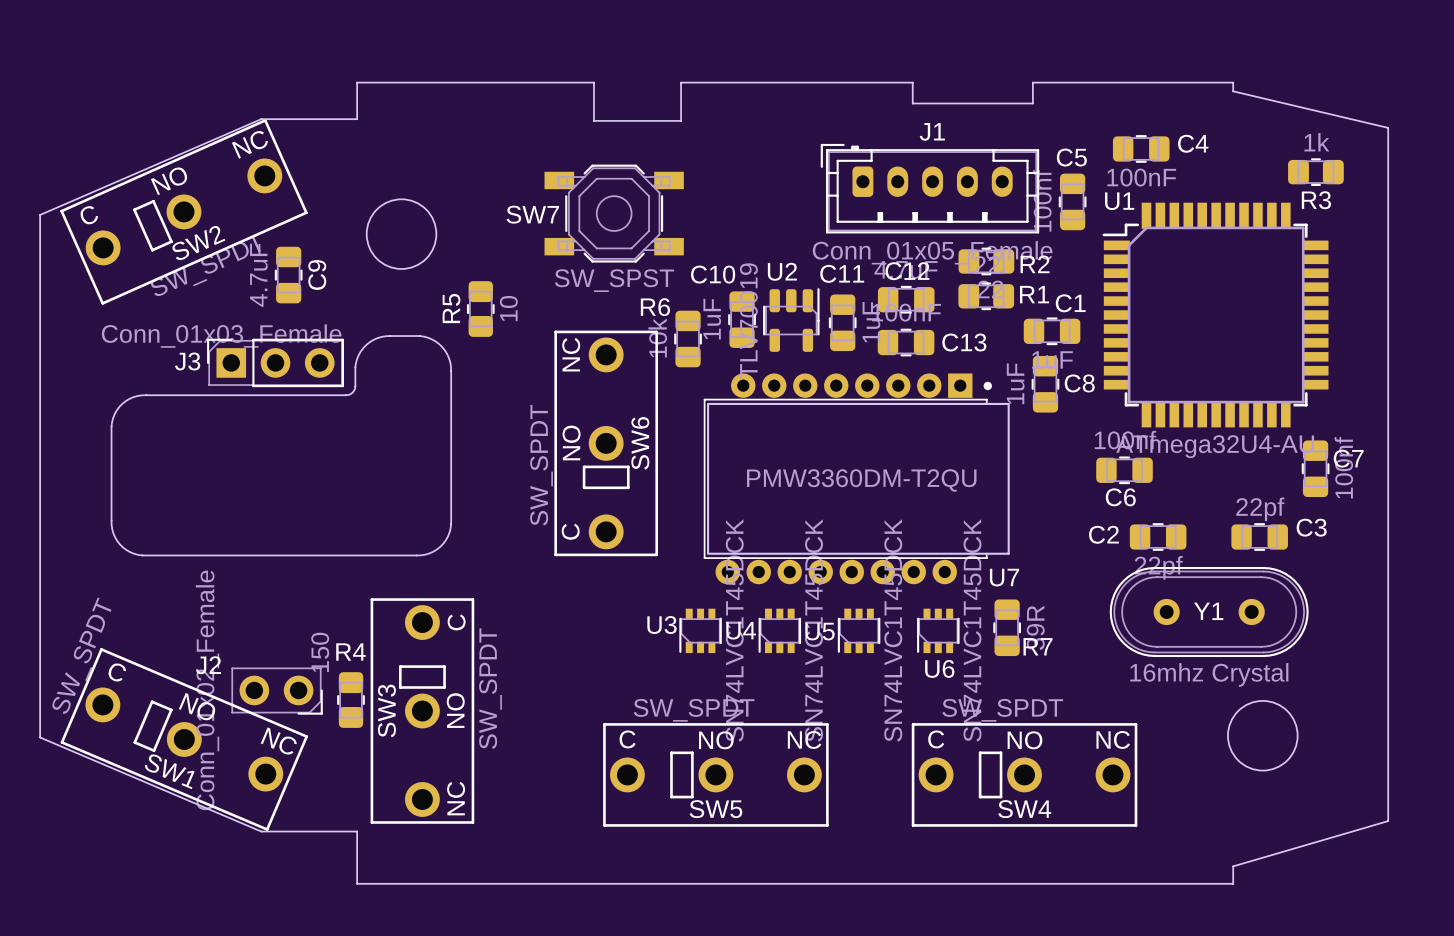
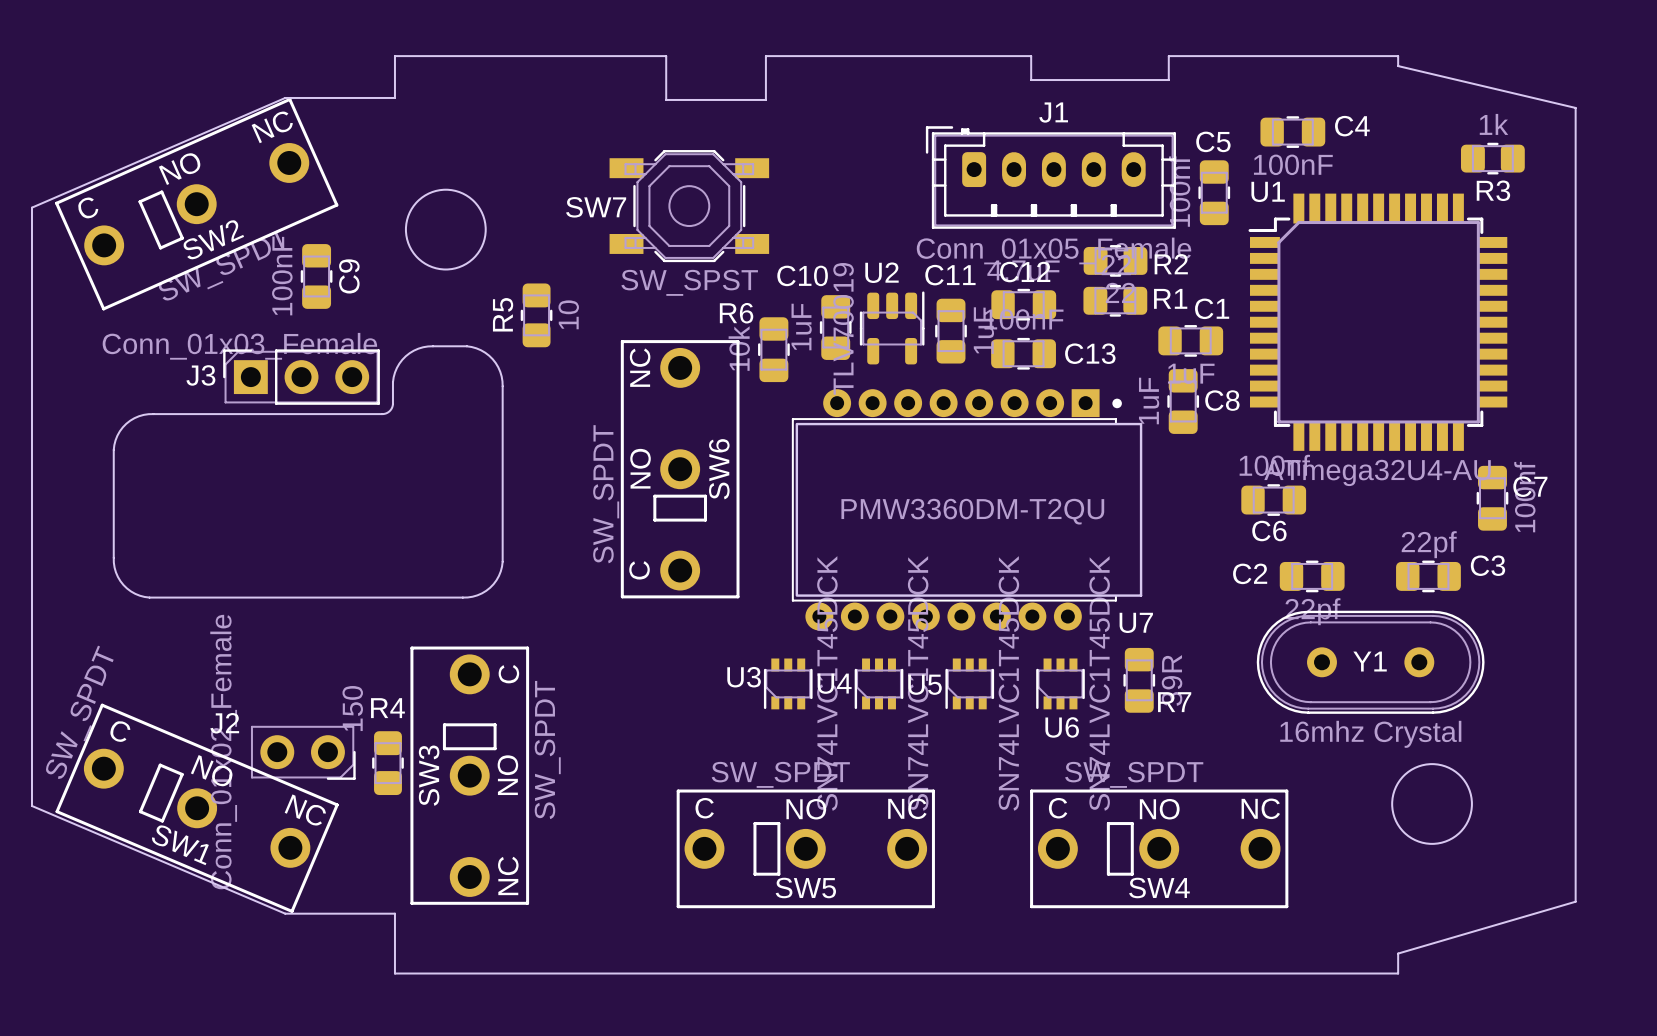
C9 value: 4.7uF (258, 275) -> 100nF (282, 275)

